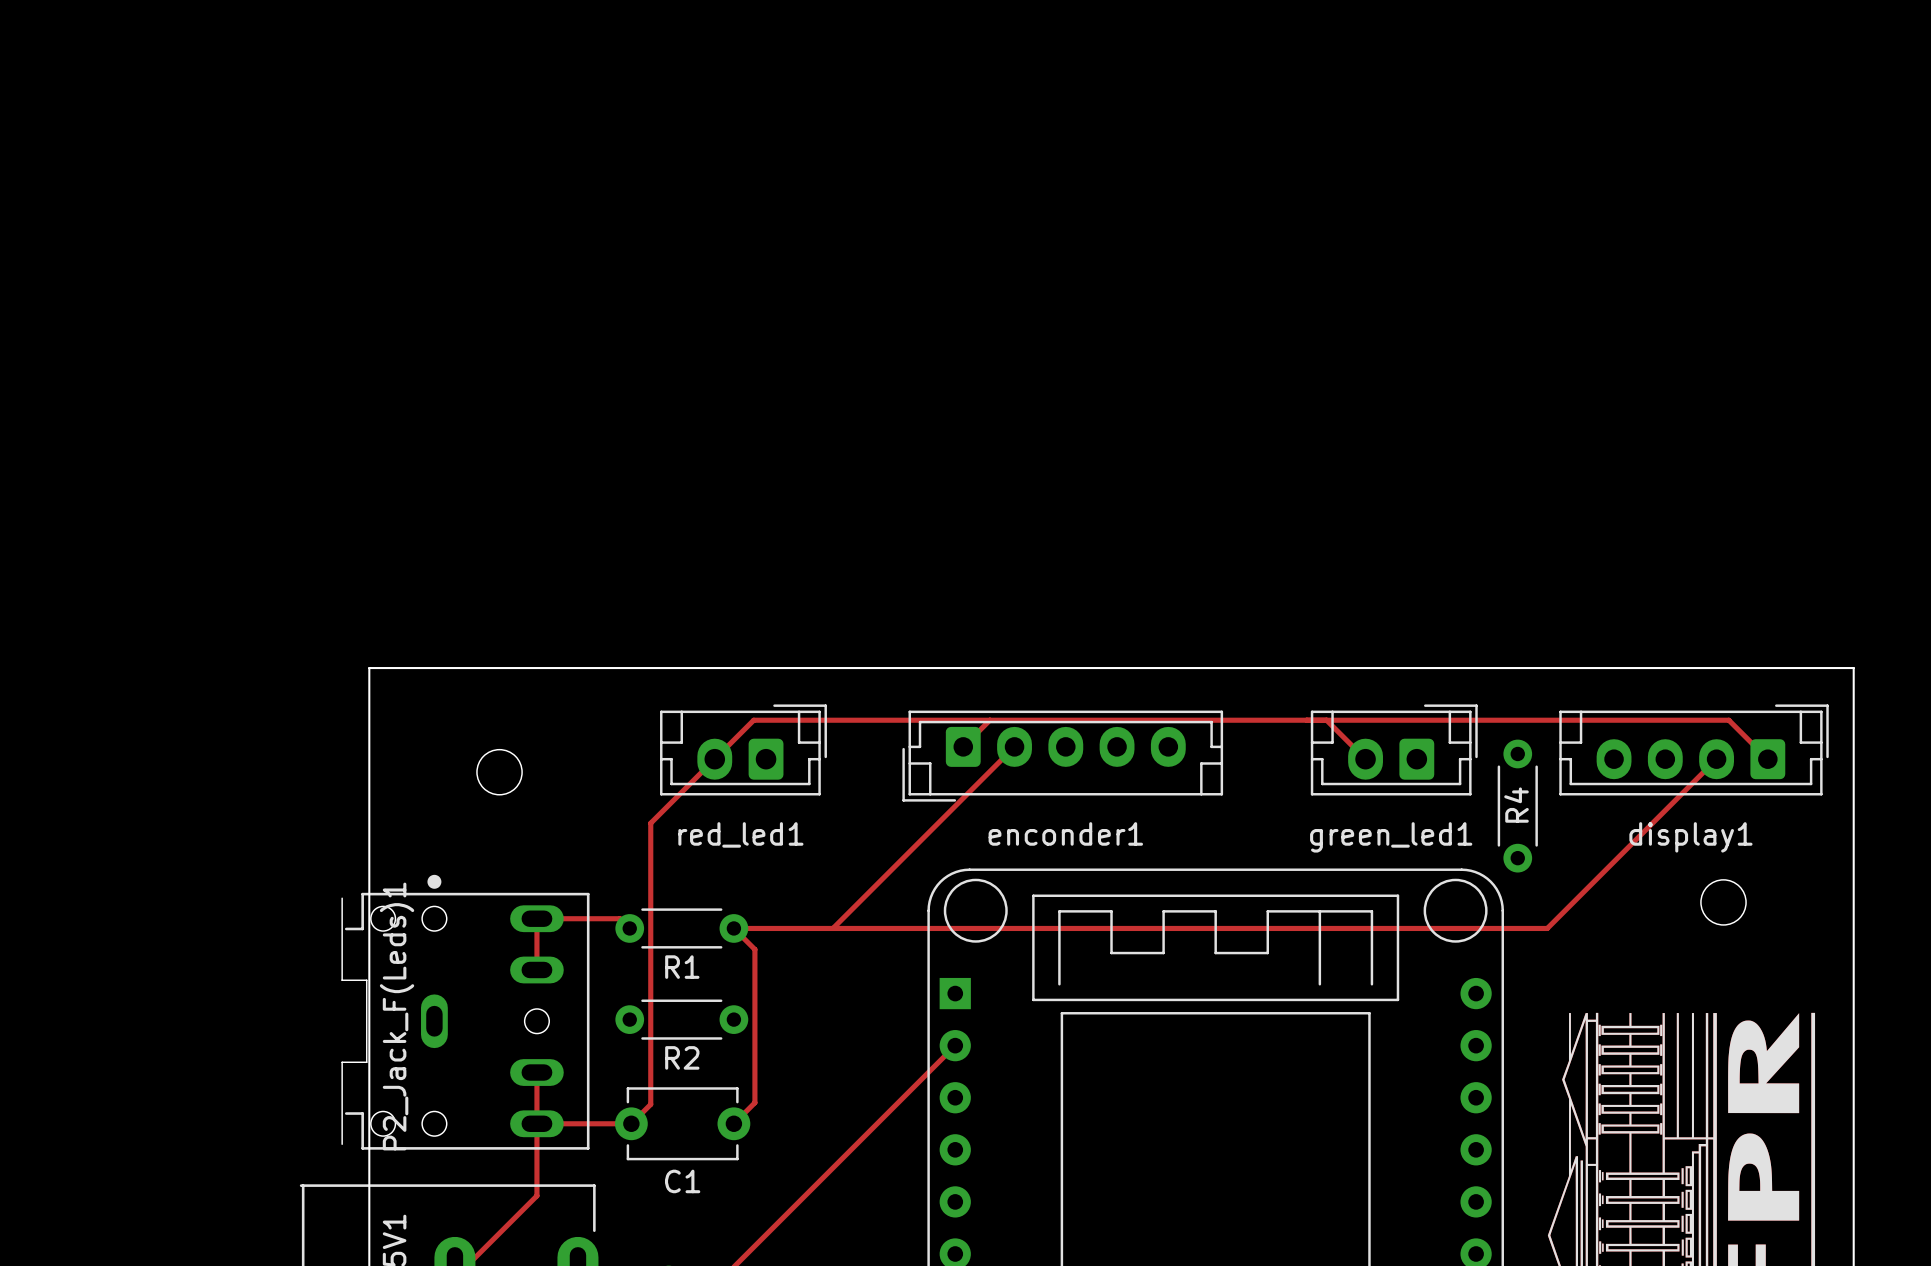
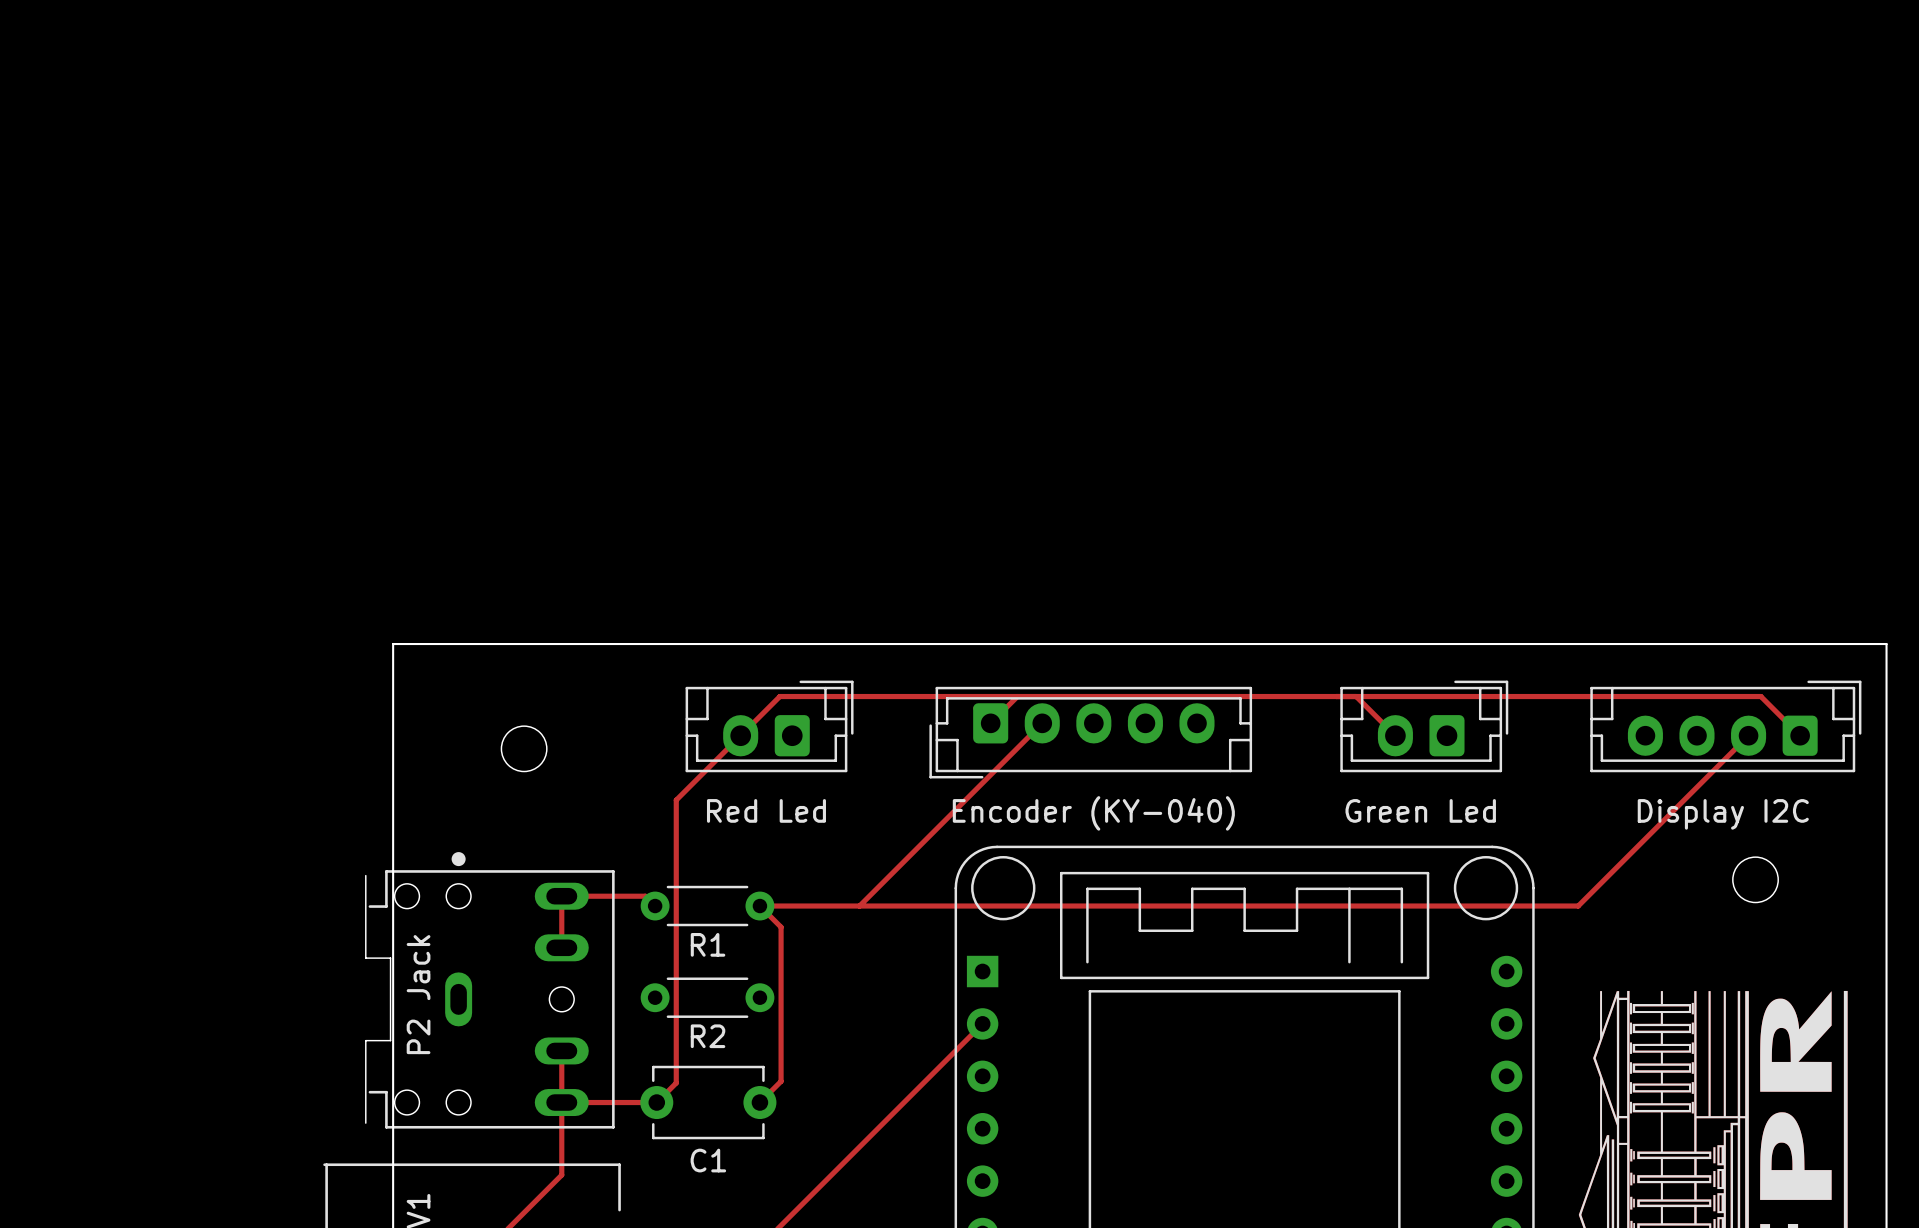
R4: (1517, 806) -> none
enconder1 name: enconder1 (1065, 833) -> Encoder (KY-040) (1093, 813)
red_led1 name: red_led1 (740, 834) -> Red Led (766, 810)
green_led1 name: green_led1 (1391, 837) -> Green Led (1420, 810)
display1 name: display1 (1690, 837) -> Display I2C (1723, 814)
P2_Jack_F(Leds)1 name: P2_Jack_F(Leds)1 (397, 1016) -> P2 Jack (418, 994)

